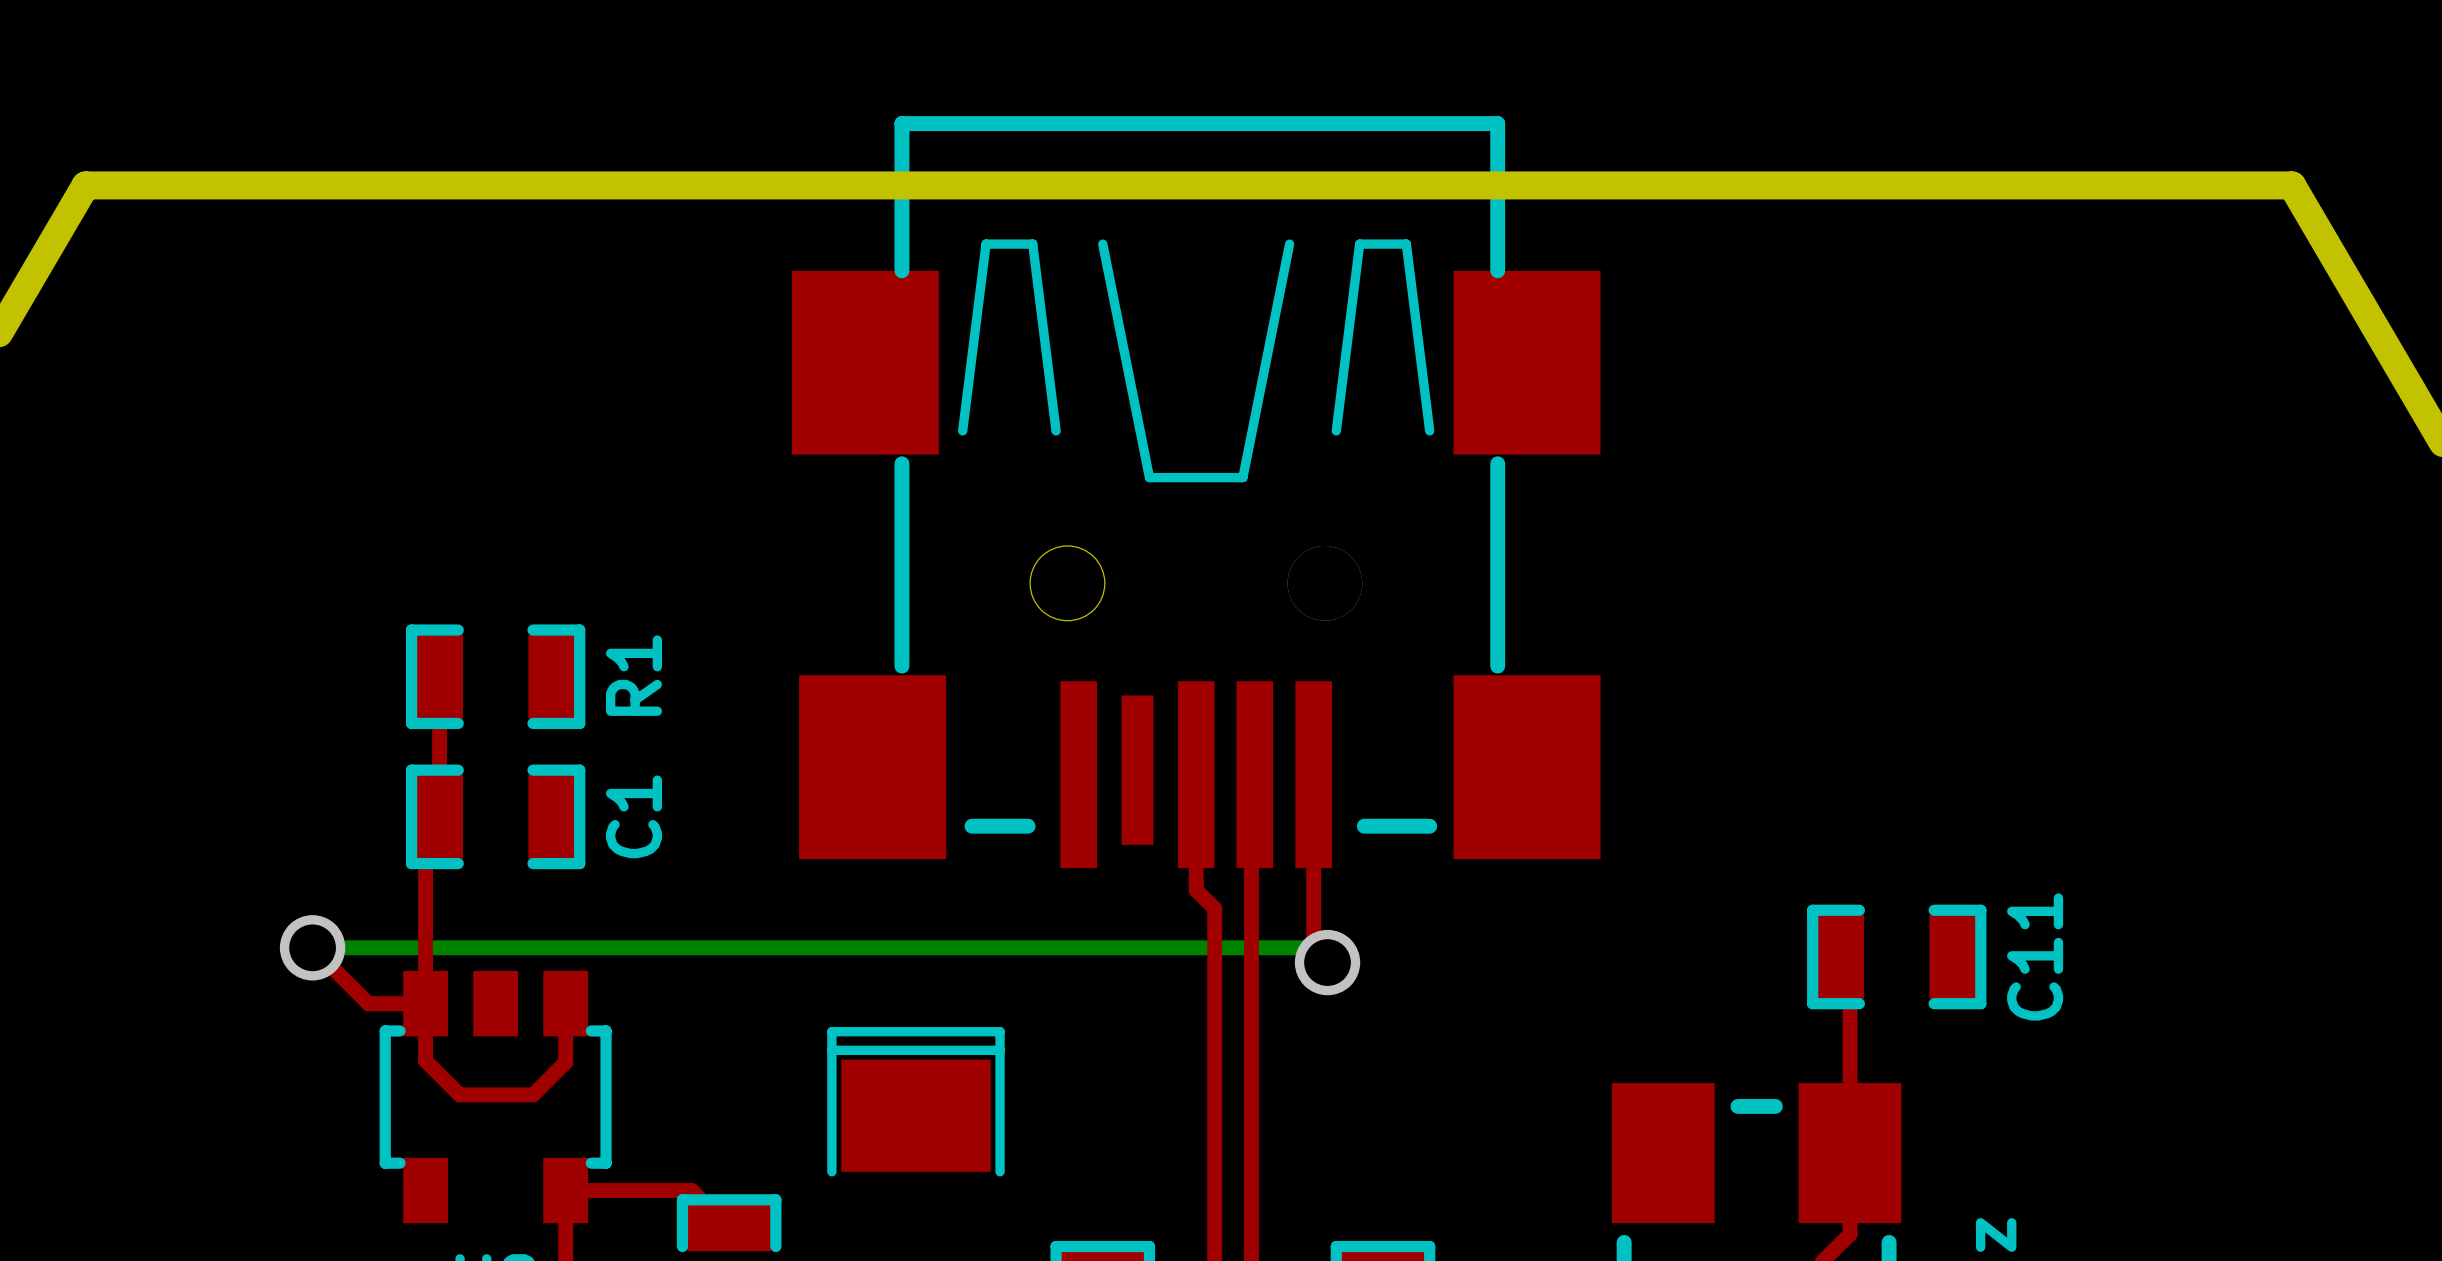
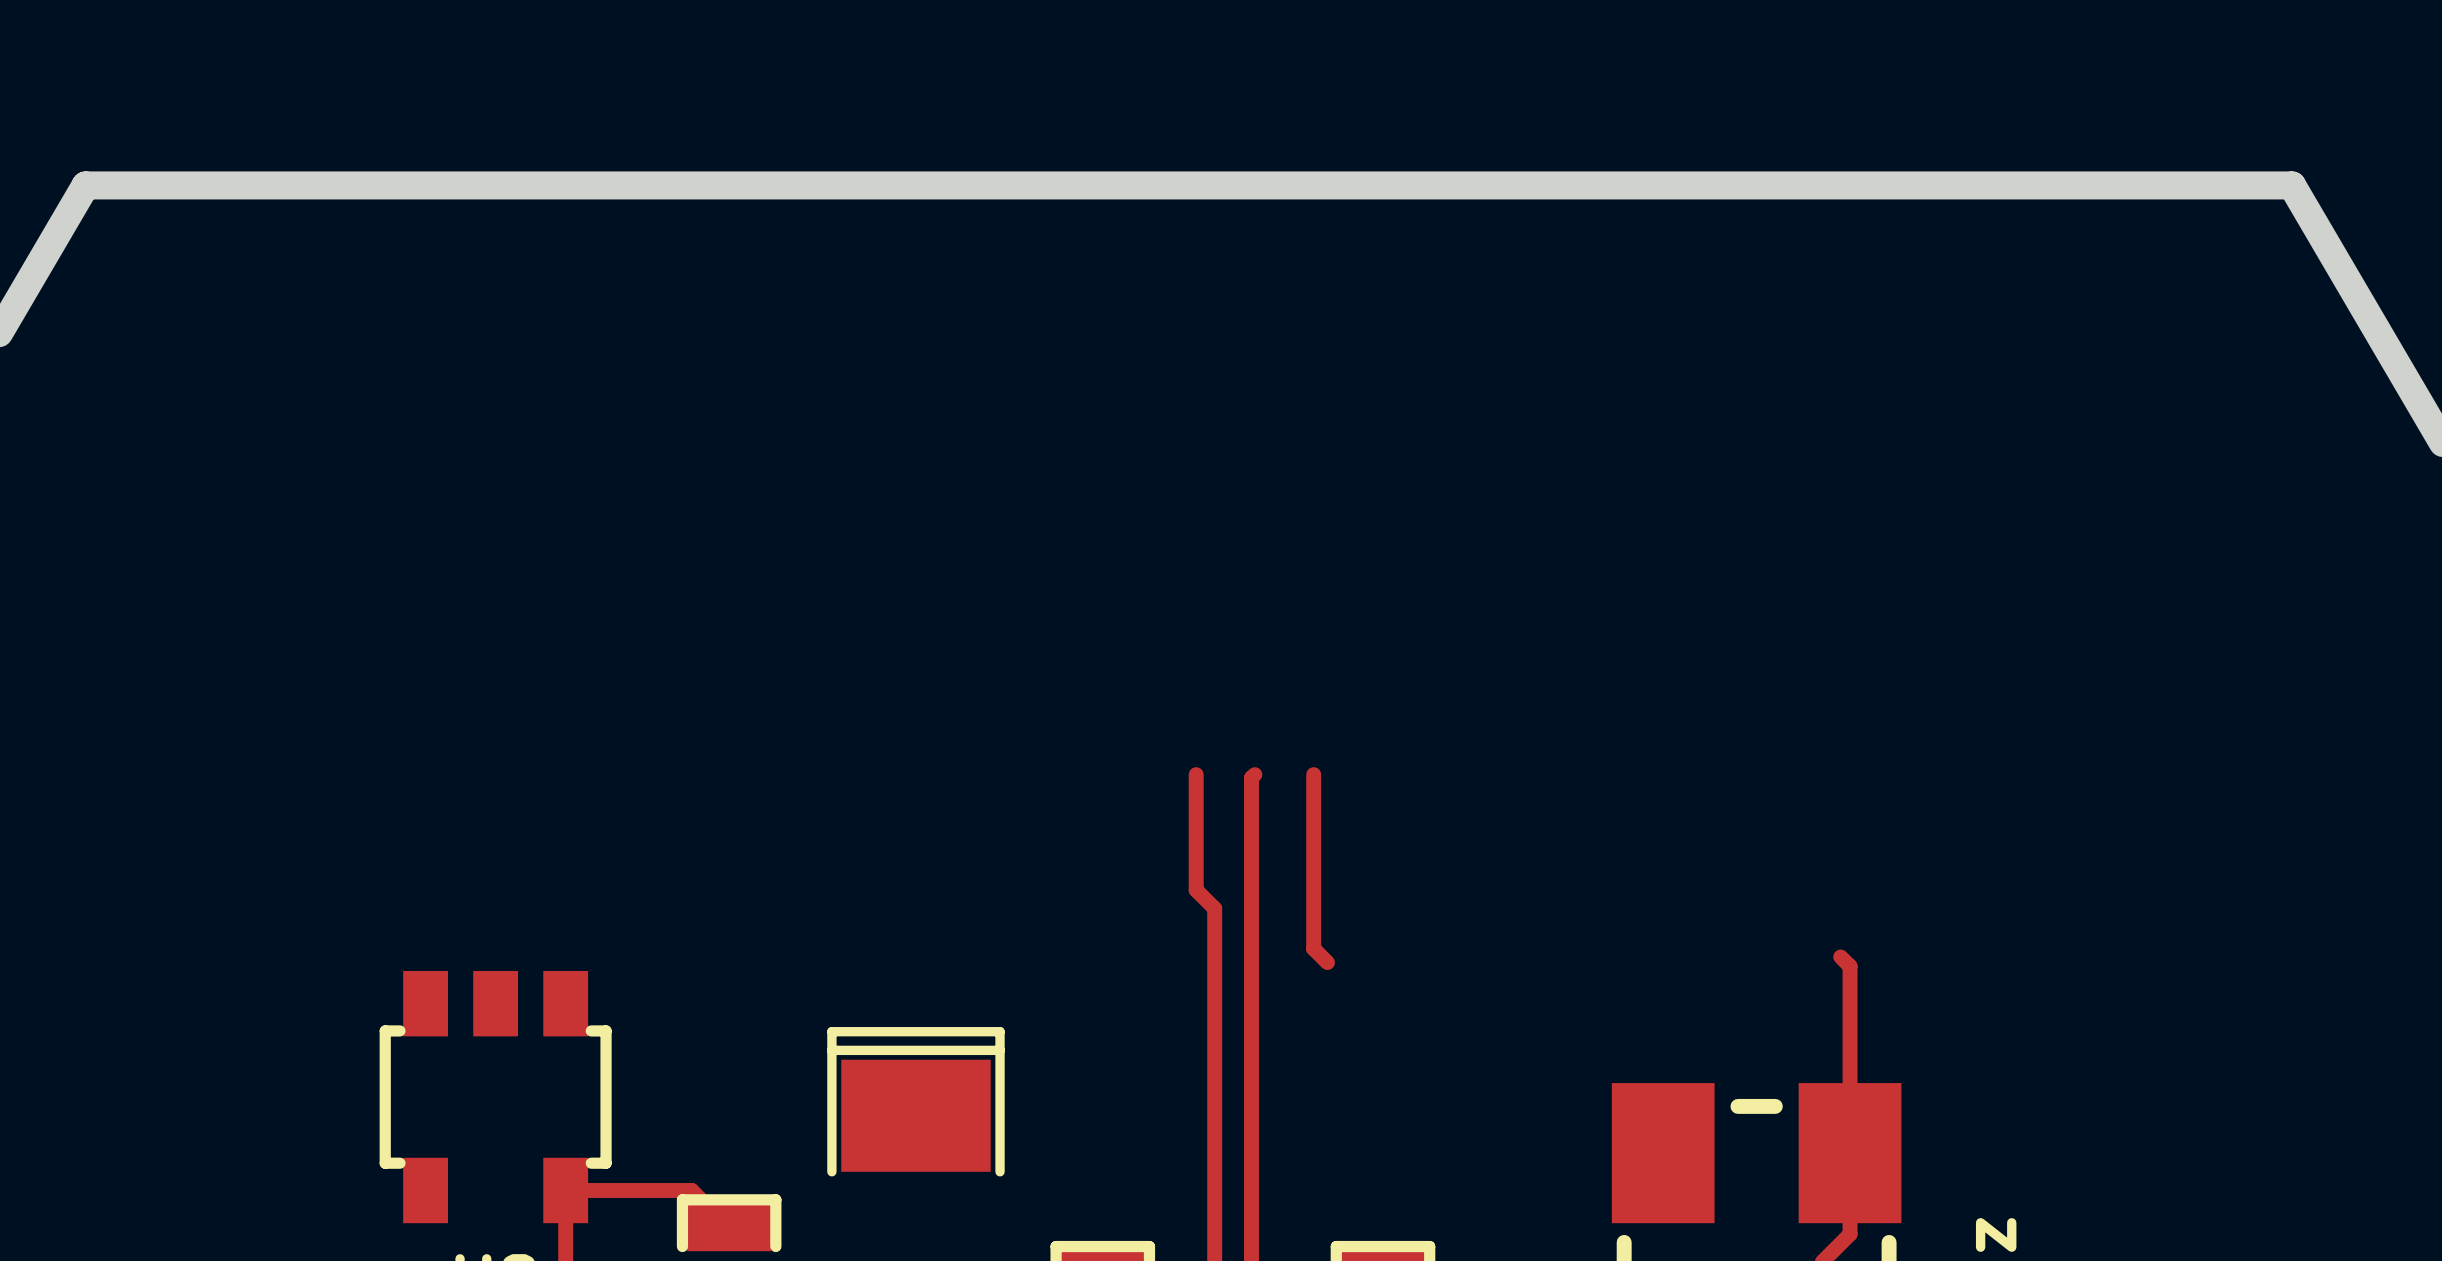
part: (1196, 492) -> none
top track: (439, 676) (439, 816) (425, 830) (425, 1060) (459, 1094) (533, 1094) (565, 1062) (565, 1003) -> none
R1: (495, 676) -> none
C1: (495, 816) -> none
top track: (312, 947) (368, 1003) (425, 1003) -> none
bottom track: (312, 947) (1312, 947) (1327, 962) -> none
via: (312, 947) -> none
C11: (1896, 956) -> none
via: (1327, 962) -> none

